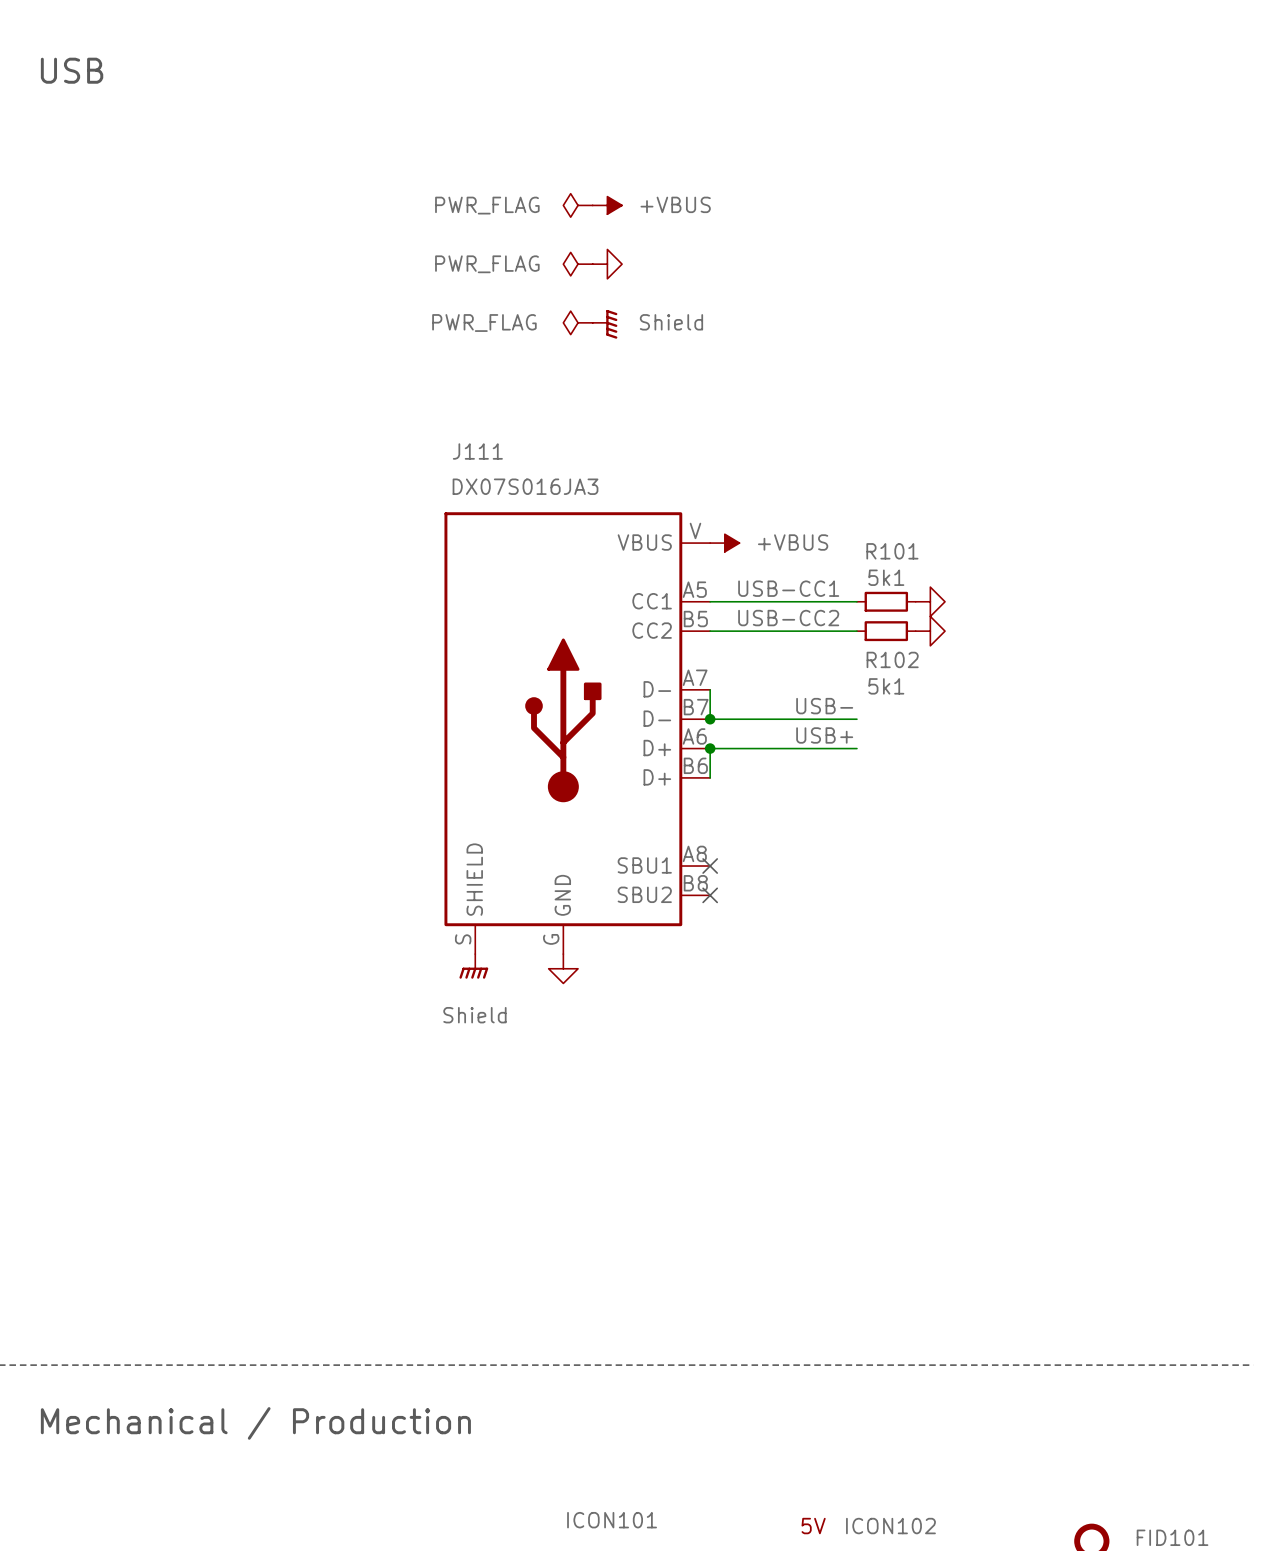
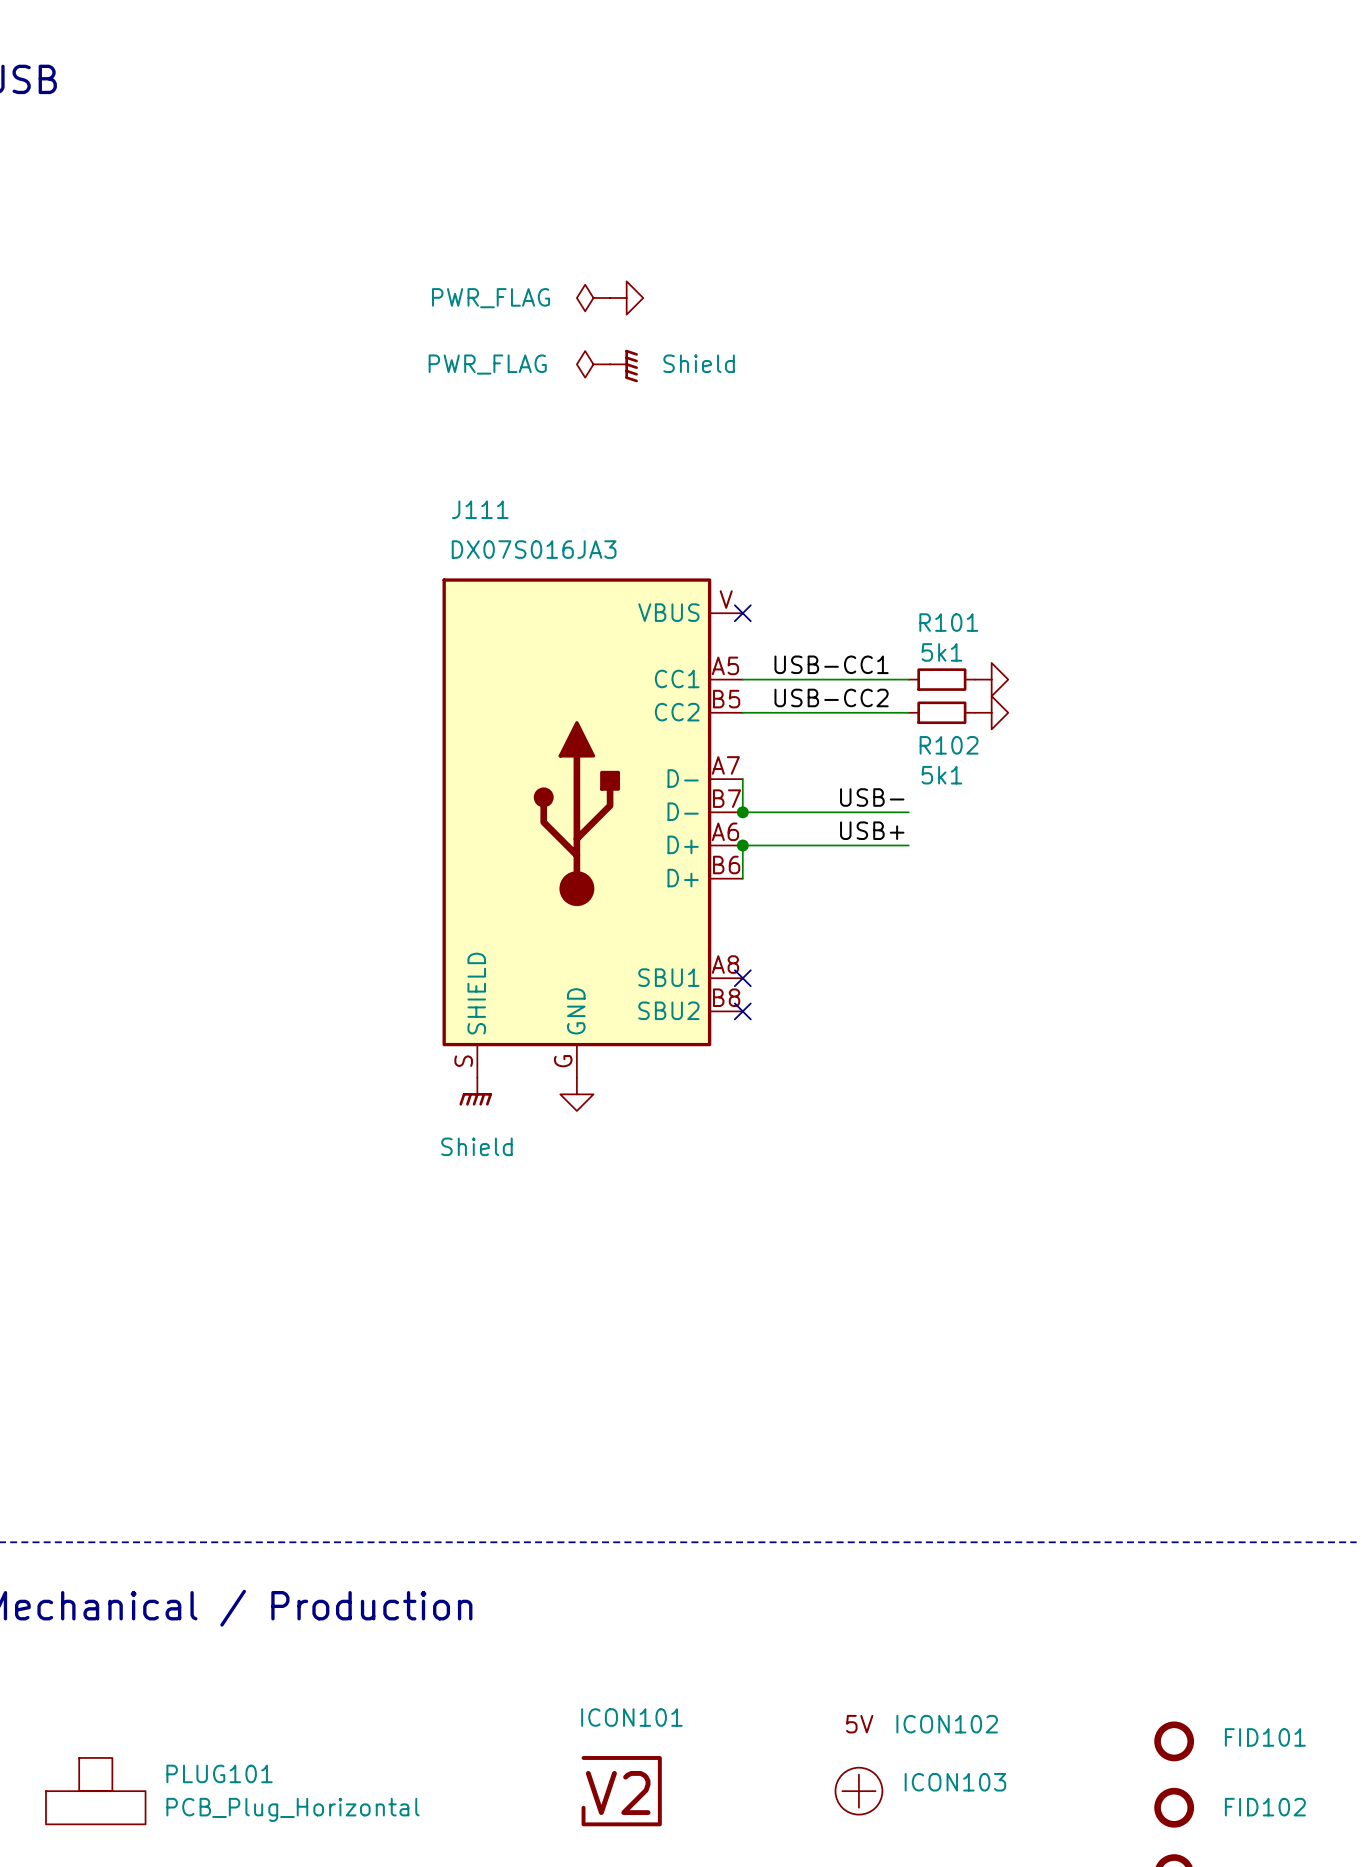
power symbol: PWR_FLAG (578, 205) -> none
power symbol: +VBUS (607, 205) -> none
no-connect mark: none -> (742, 613)
power symbol: +VBUS (724, 543) -> none

